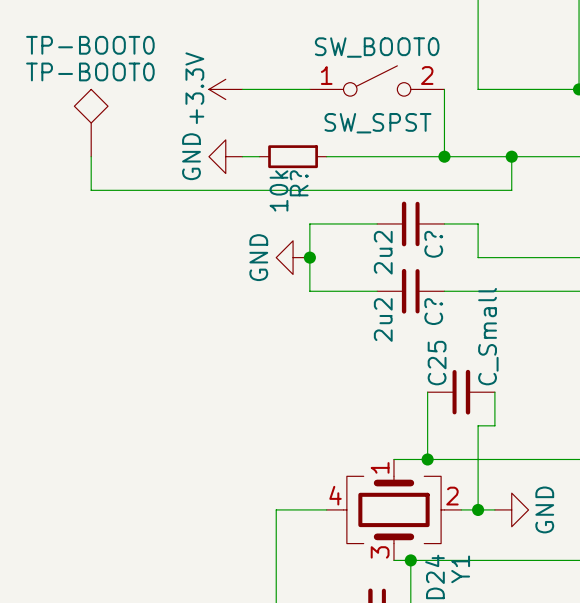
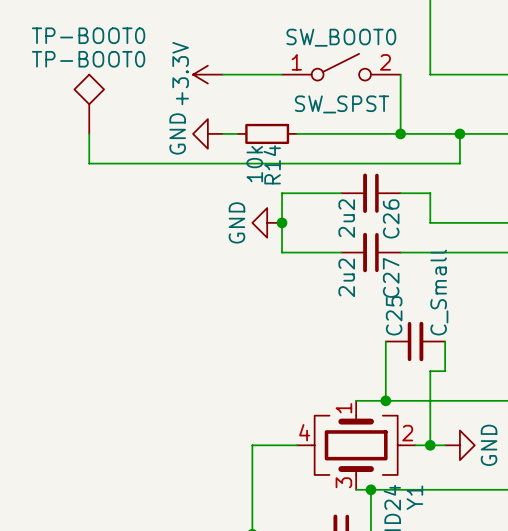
R? name: R? (299, 183) -> R14 (272, 164)
C? name: C? (433, 244) -> C26 (391, 218)
C? name: C? (433, 311) -> C27 (391, 277)

